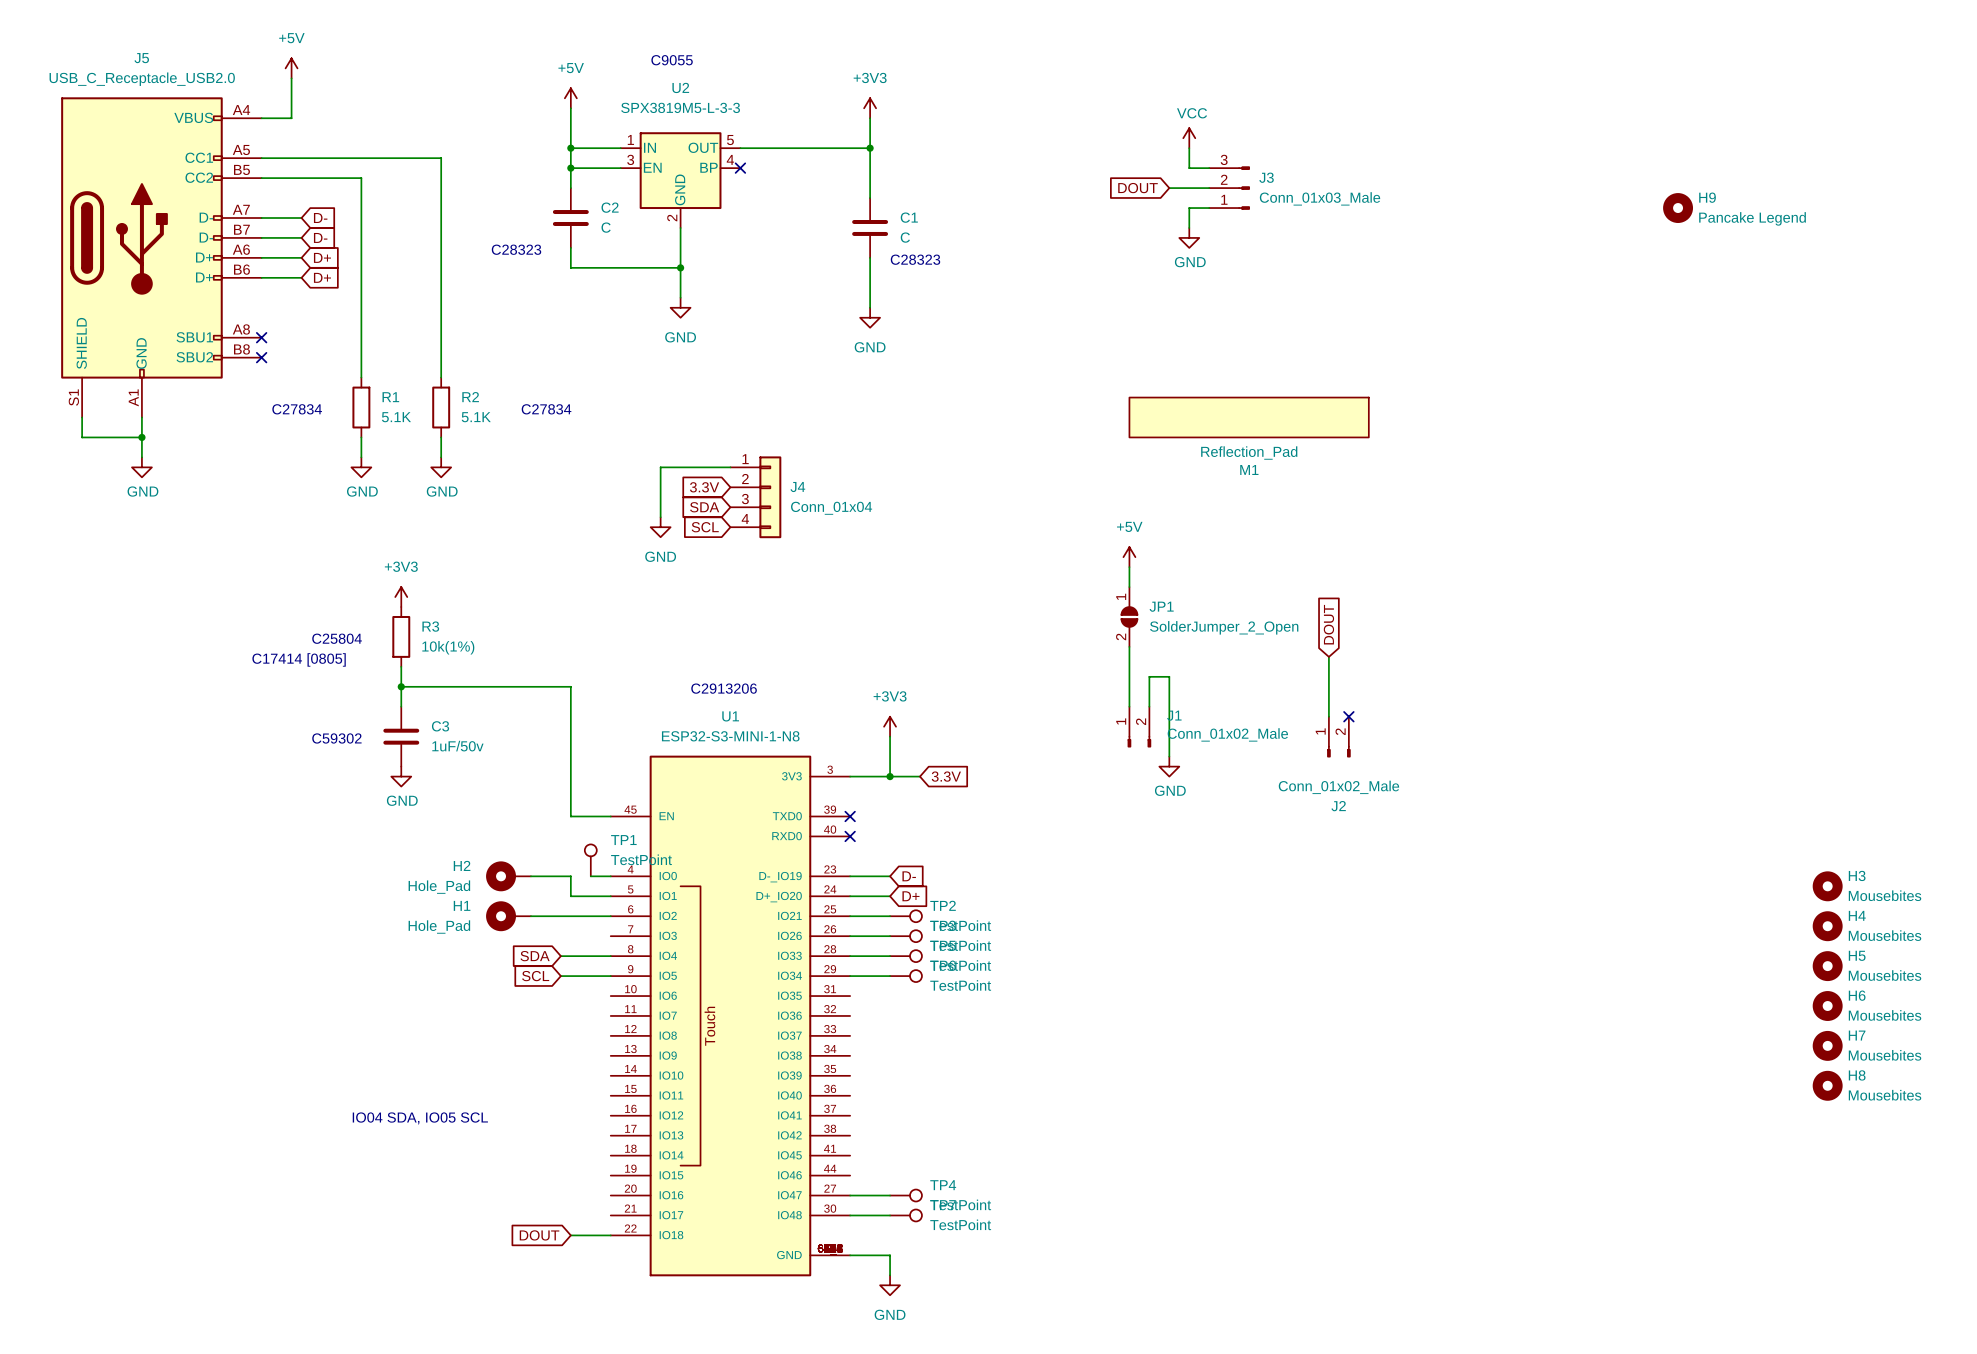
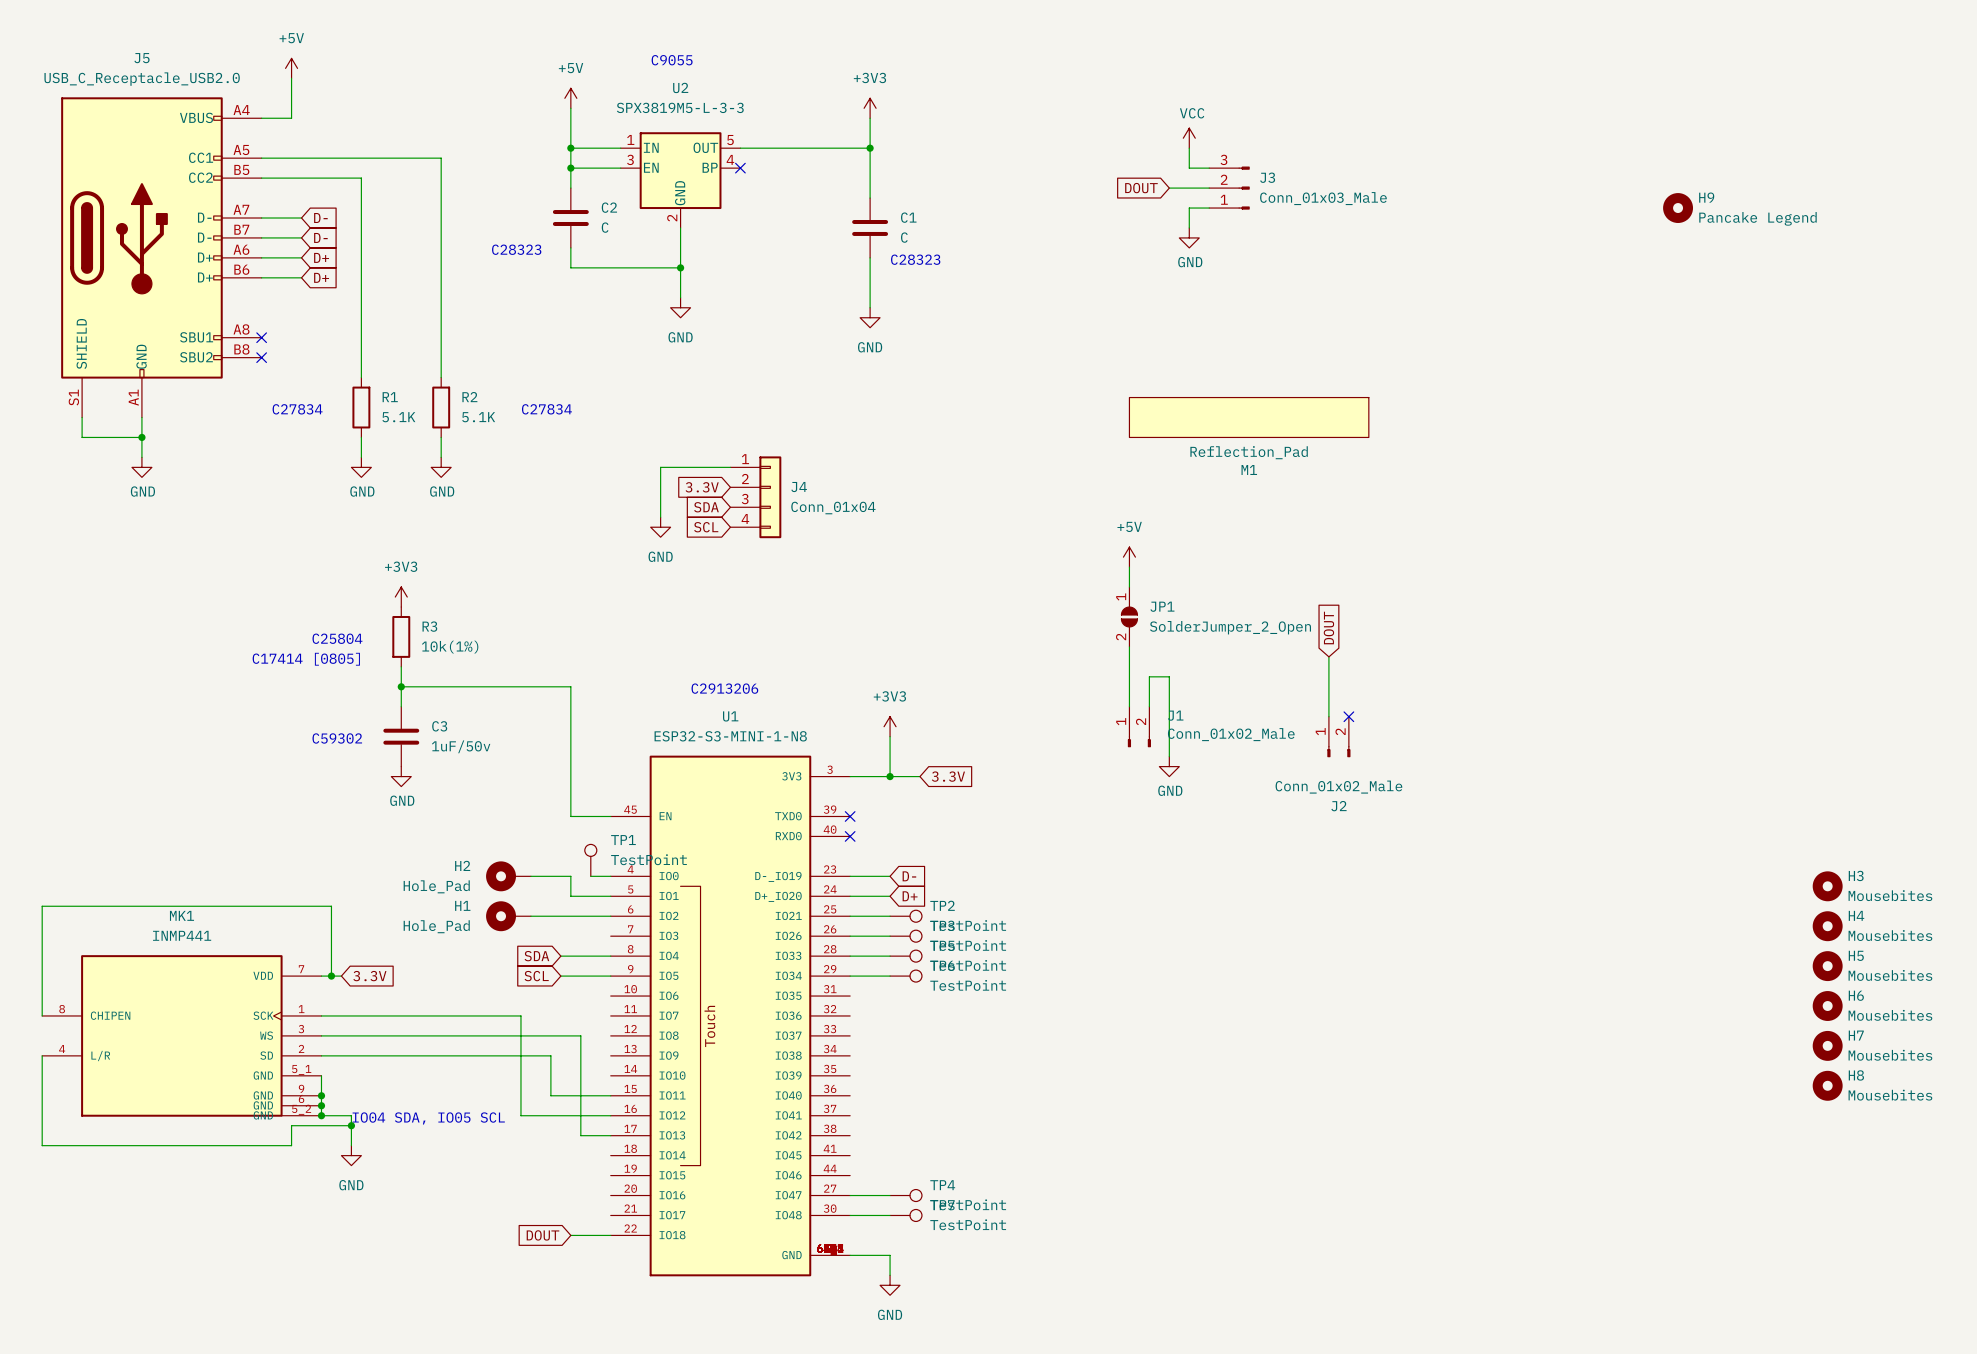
wire: none -> (321, 976) (341, 976)
wire: none -> (331, 976) (331, 906) (42, 906) (42, 1015)
junction: none -> (331, 976)
global label: none -> 3.3V (369, 976)
wire: none -> (321, 1015) (520, 1015) (520, 1115) (610, 1115)
MK1: none -> INMP441 (181, 1035)
wire: none -> (321, 1035) (580, 1035) (580, 1135) (610, 1135)
wire: none -> (42, 1055) (42, 1145) (291, 1145) (291, 1125) (351, 1125)
wire: none -> (321, 1055) (550, 1055) (550, 1095) (610, 1095)
wire: none -> (321, 1075) (321, 1115) (351, 1115) (351, 1145)
junction: none -> (321, 1095)
junction: none -> (321, 1105)
junction: none -> (321, 1115)
junction: none -> (351, 1125)
power symbol: none -> GND (351, 1155)

